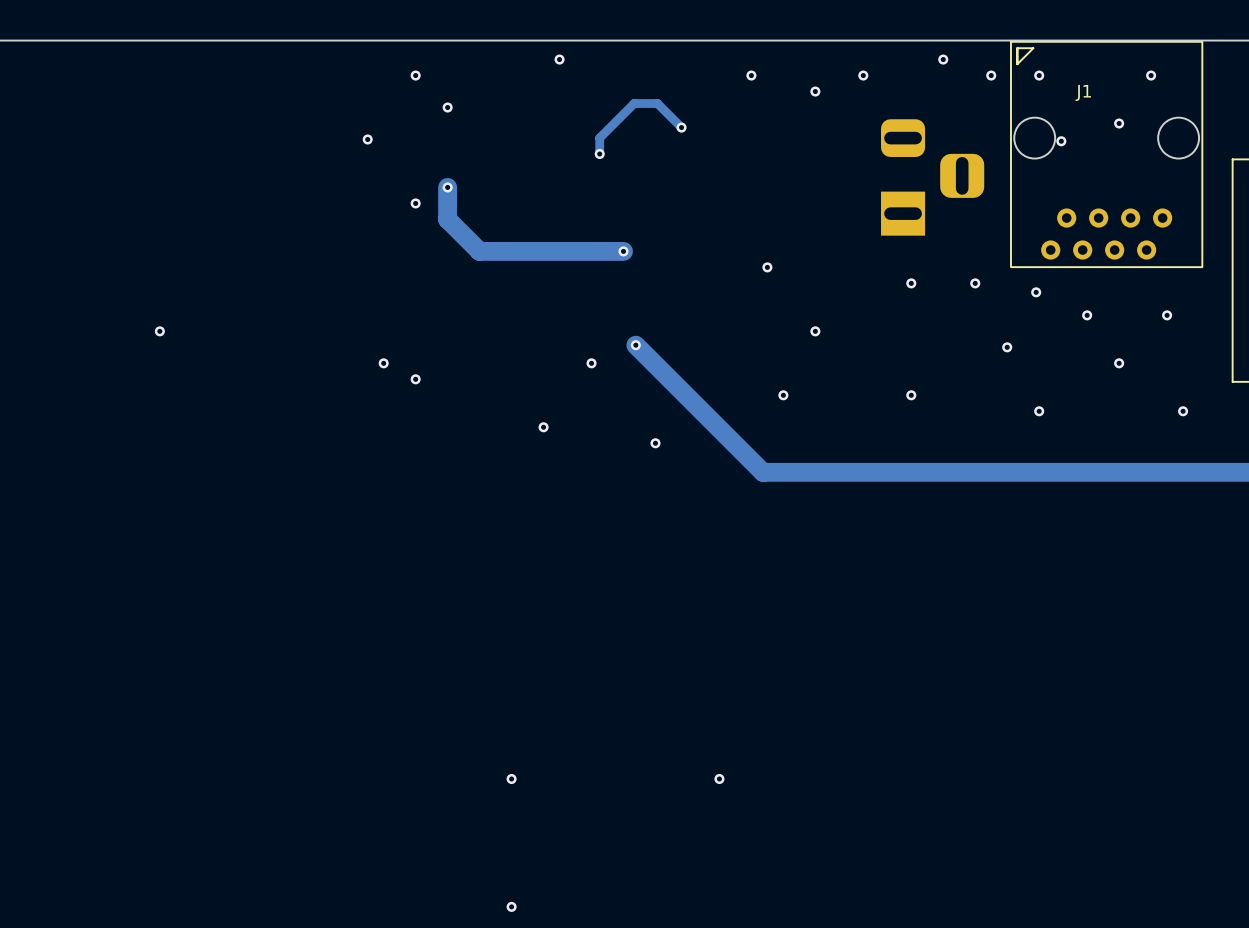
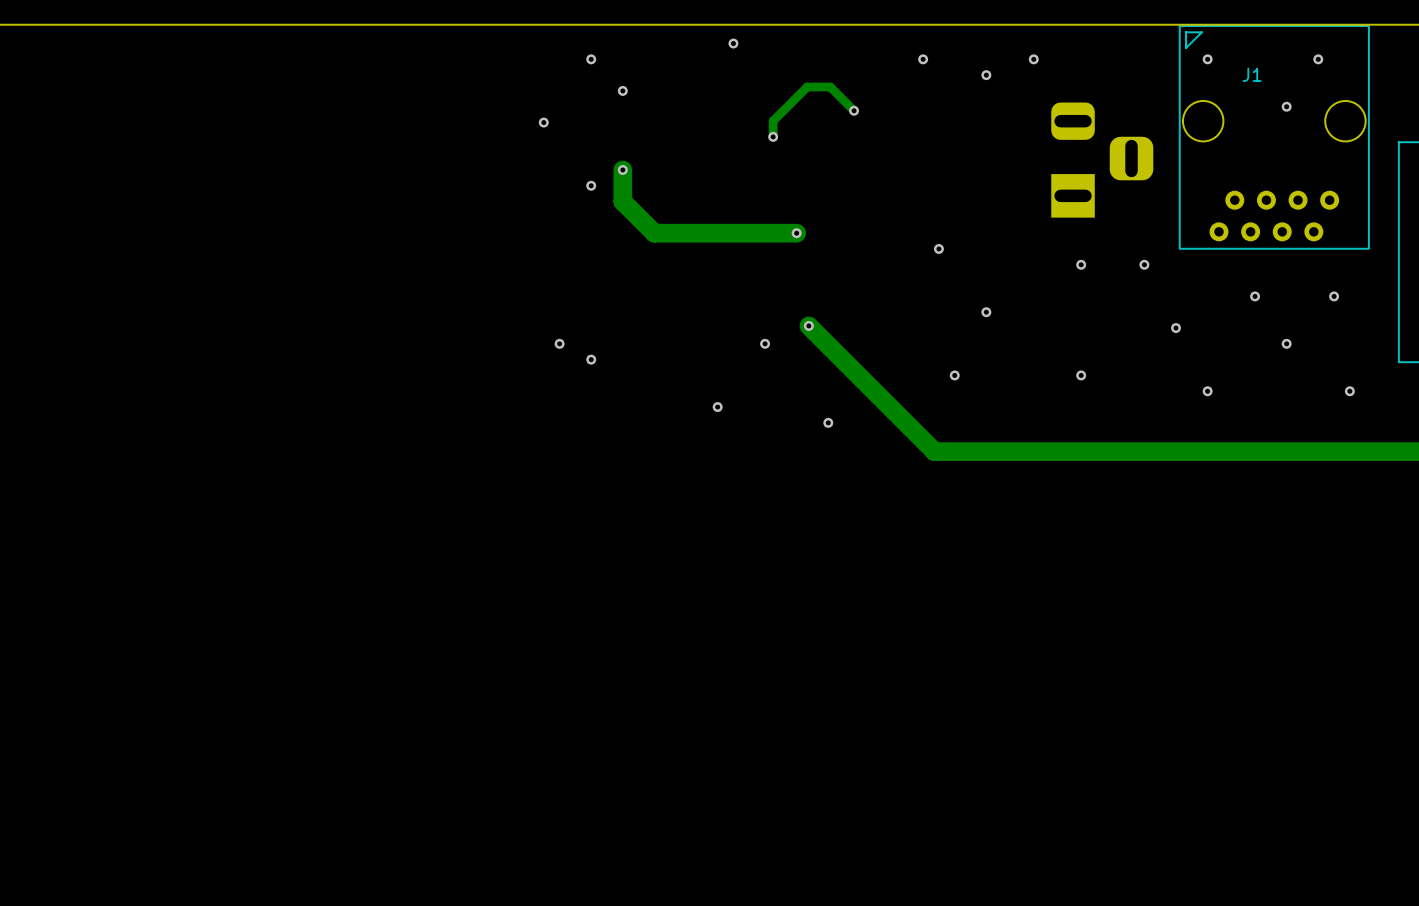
via: (943, 59) -> none
via: (991, 75) -> none
via: (1061, 141) -> none
via: (1036, 292) -> none
via: (159, 331) -> none
via: (511, 778) -> none
via: (719, 778) -> none
via: (511, 906) -> none

